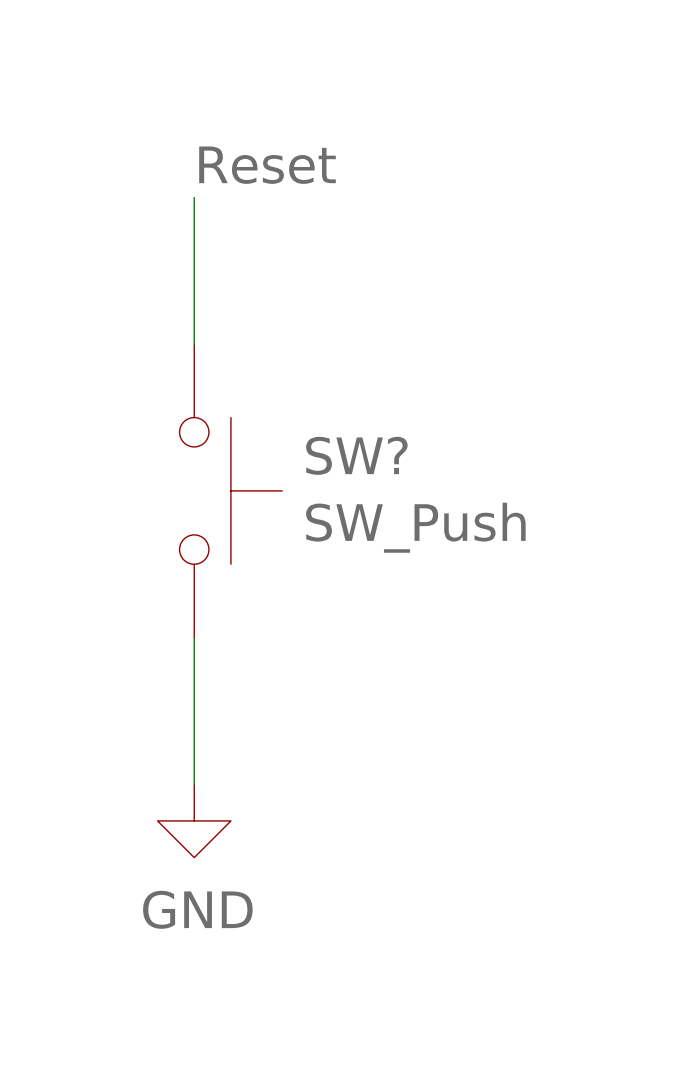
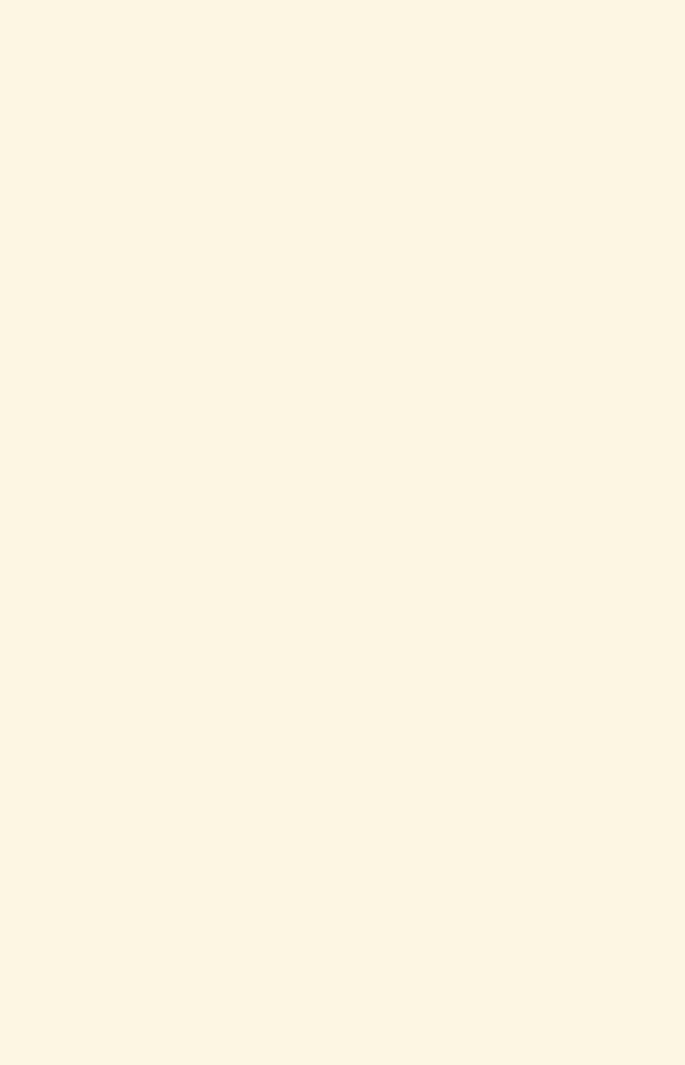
label: Reset (267, 165) -> none
wire: (194, 197) (194, 344) -> none
SW?: SW_Push (230, 490) -> none
wire: (194, 637) (194, 784) -> none
power symbol: GND (194, 820) -> none

